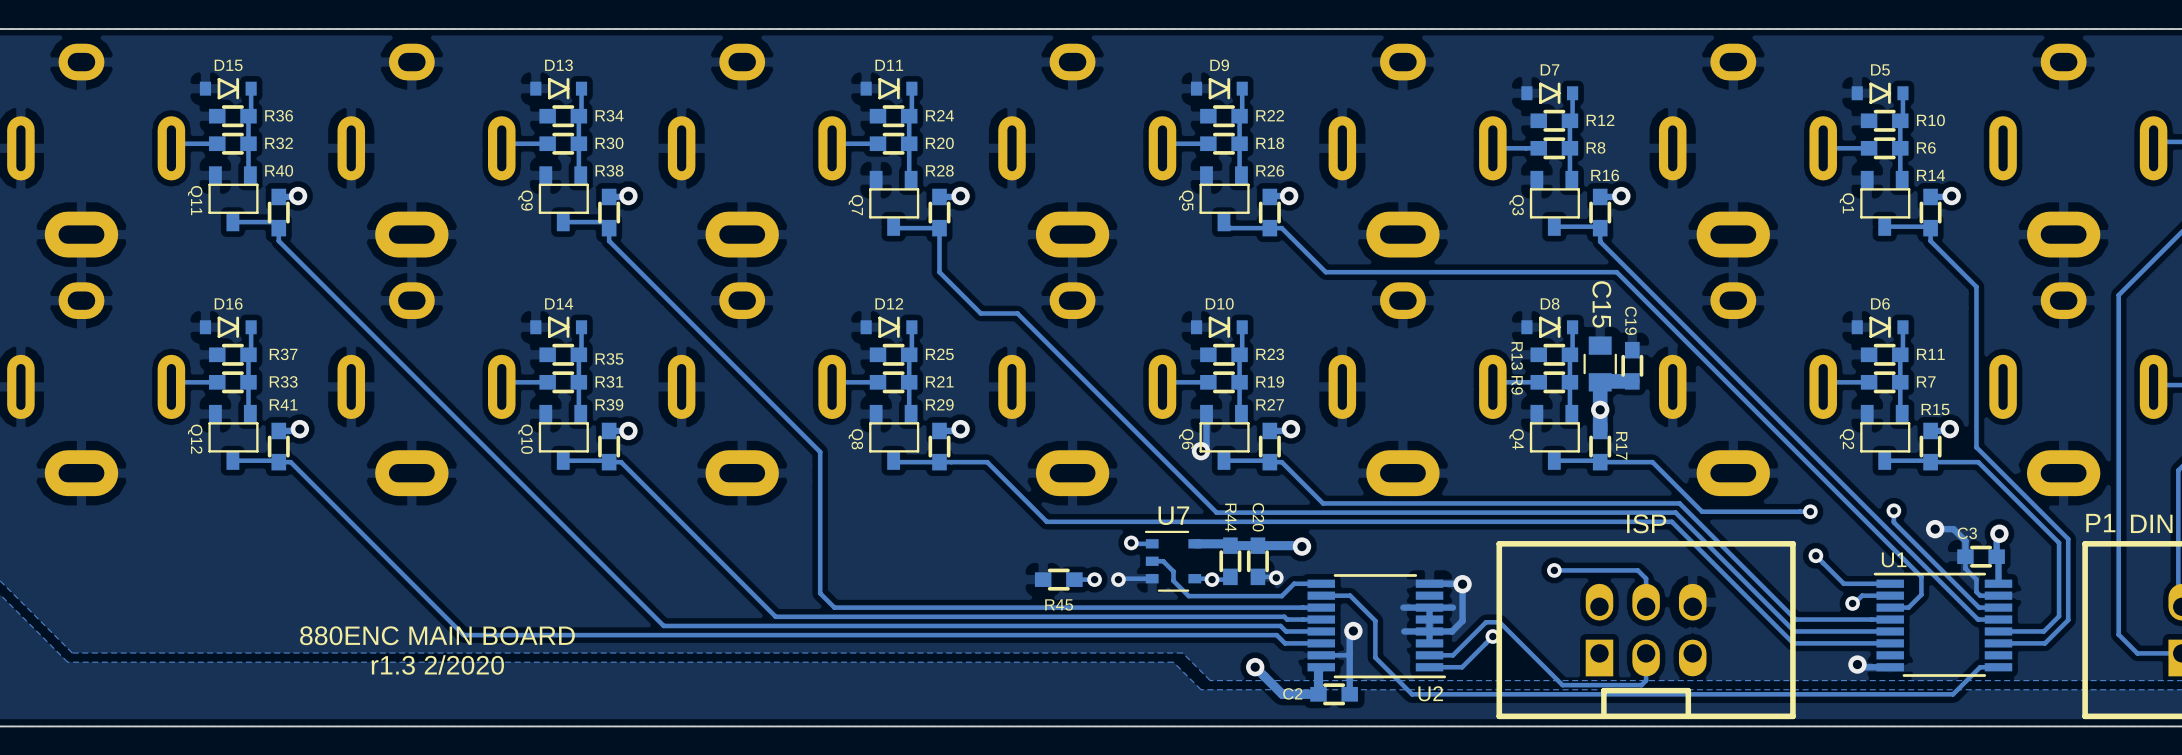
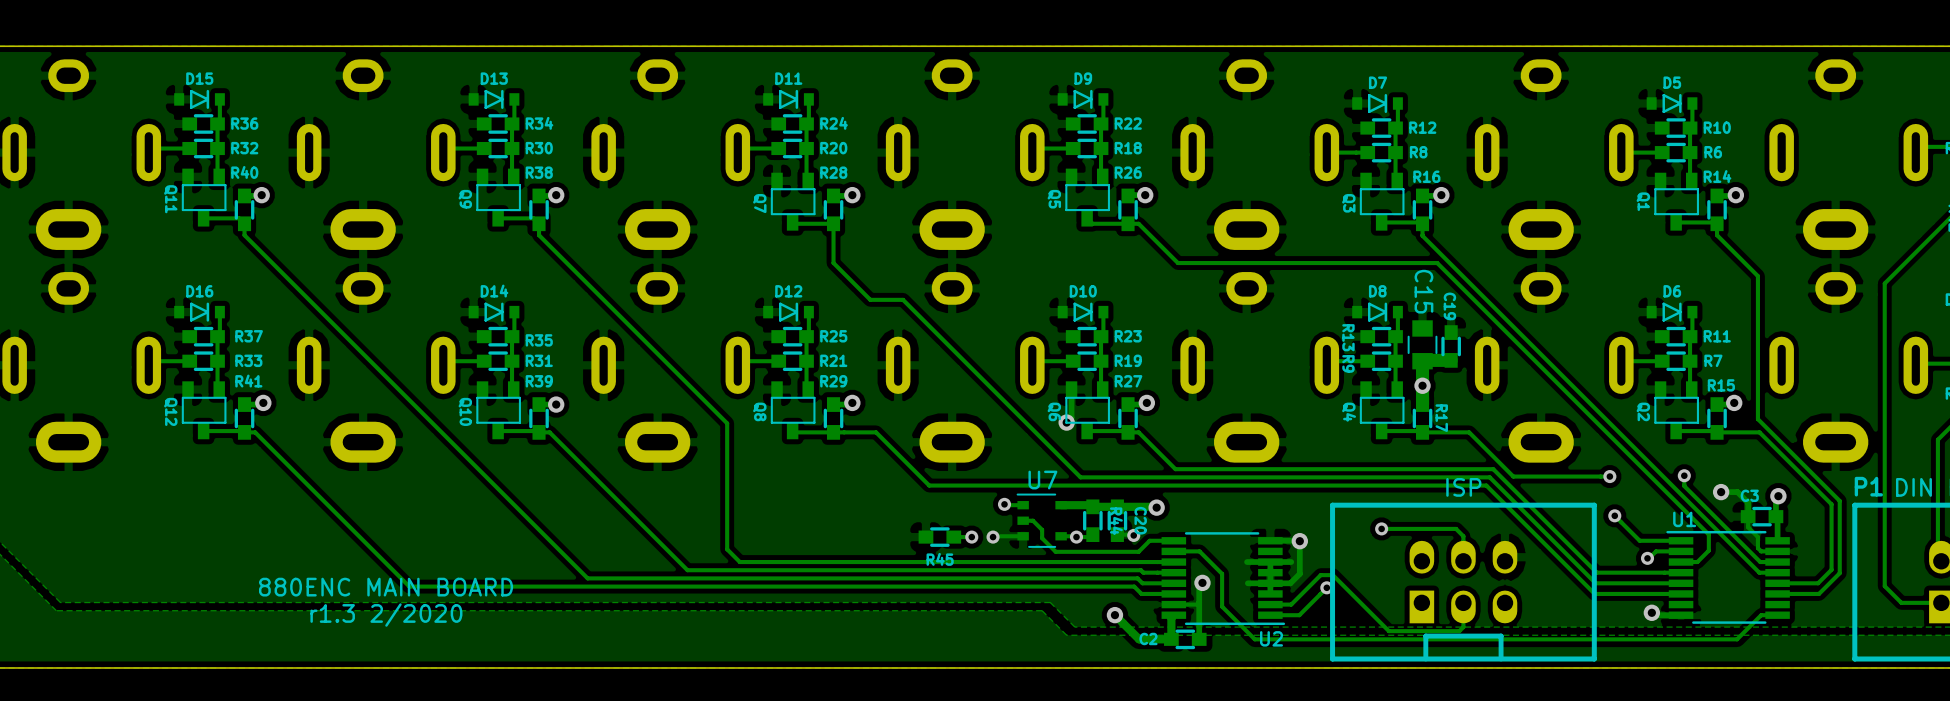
R44 name position: R44 (1230, 517) -> R44 (1116, 521)
C20 name position: C20 (1258, 517) -> C20 (1140, 520)

